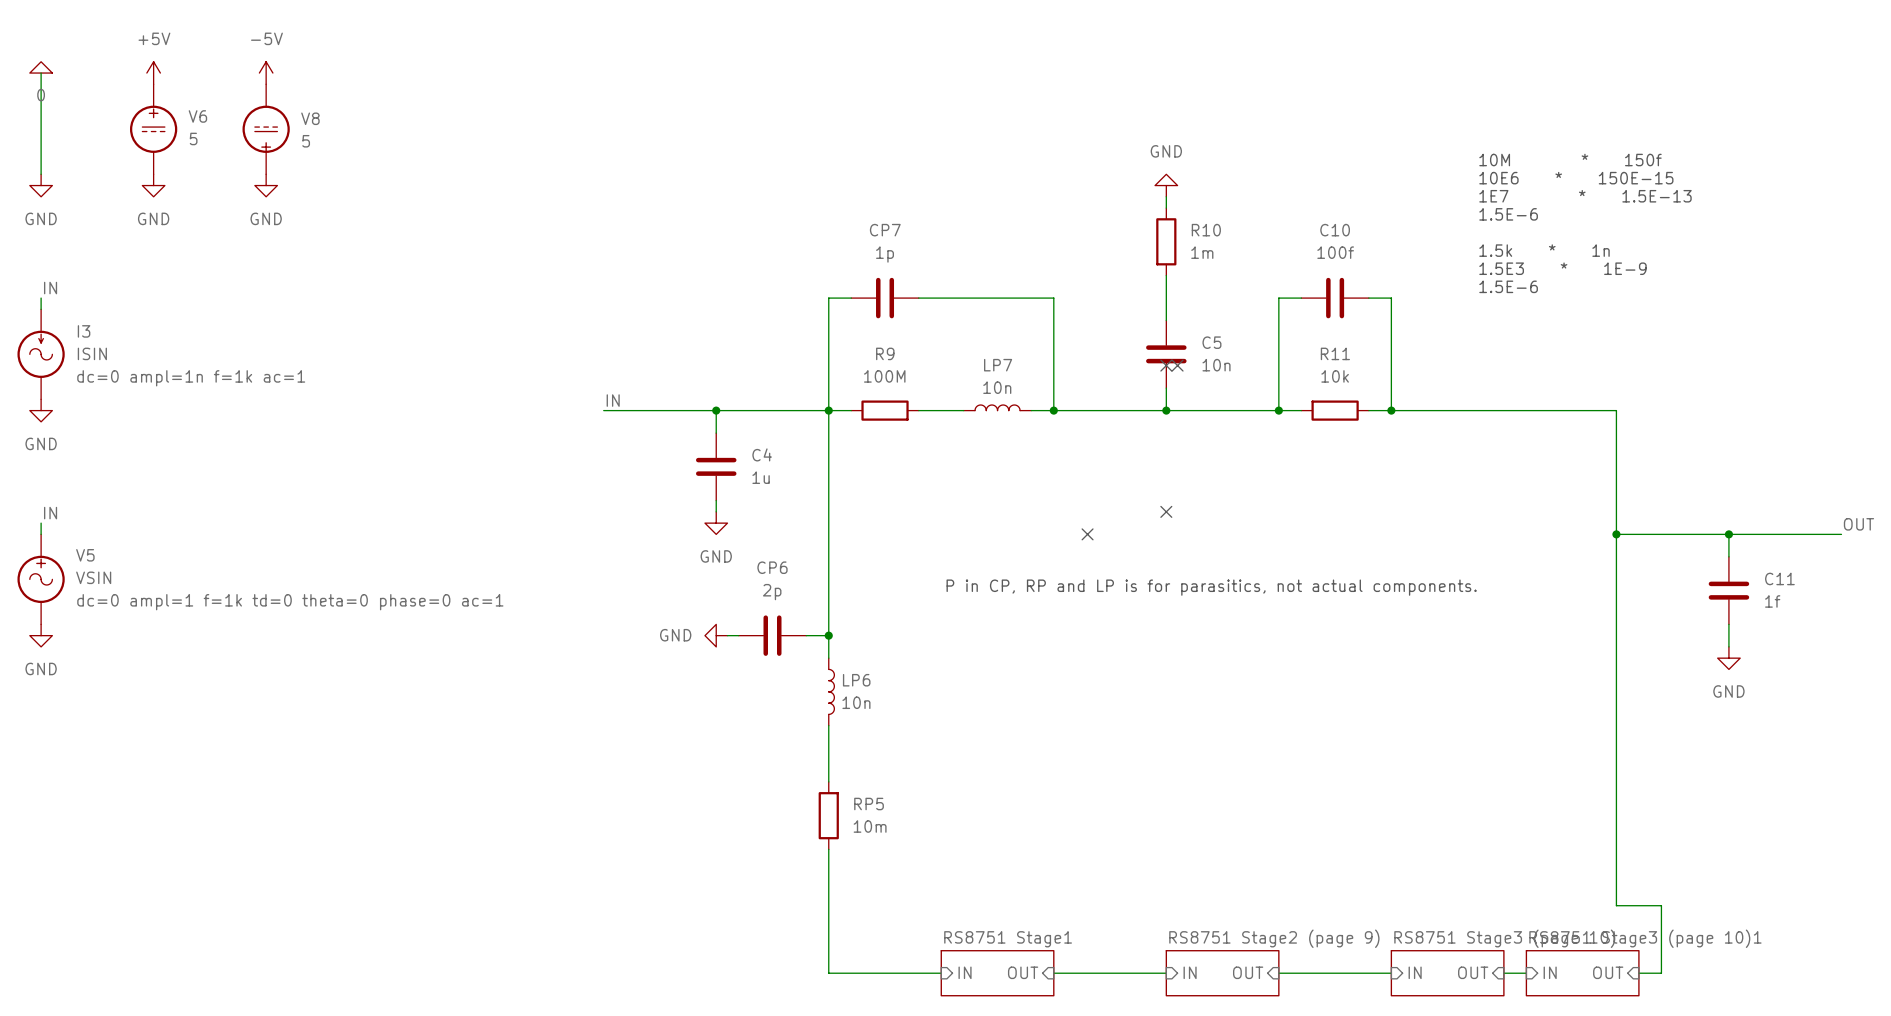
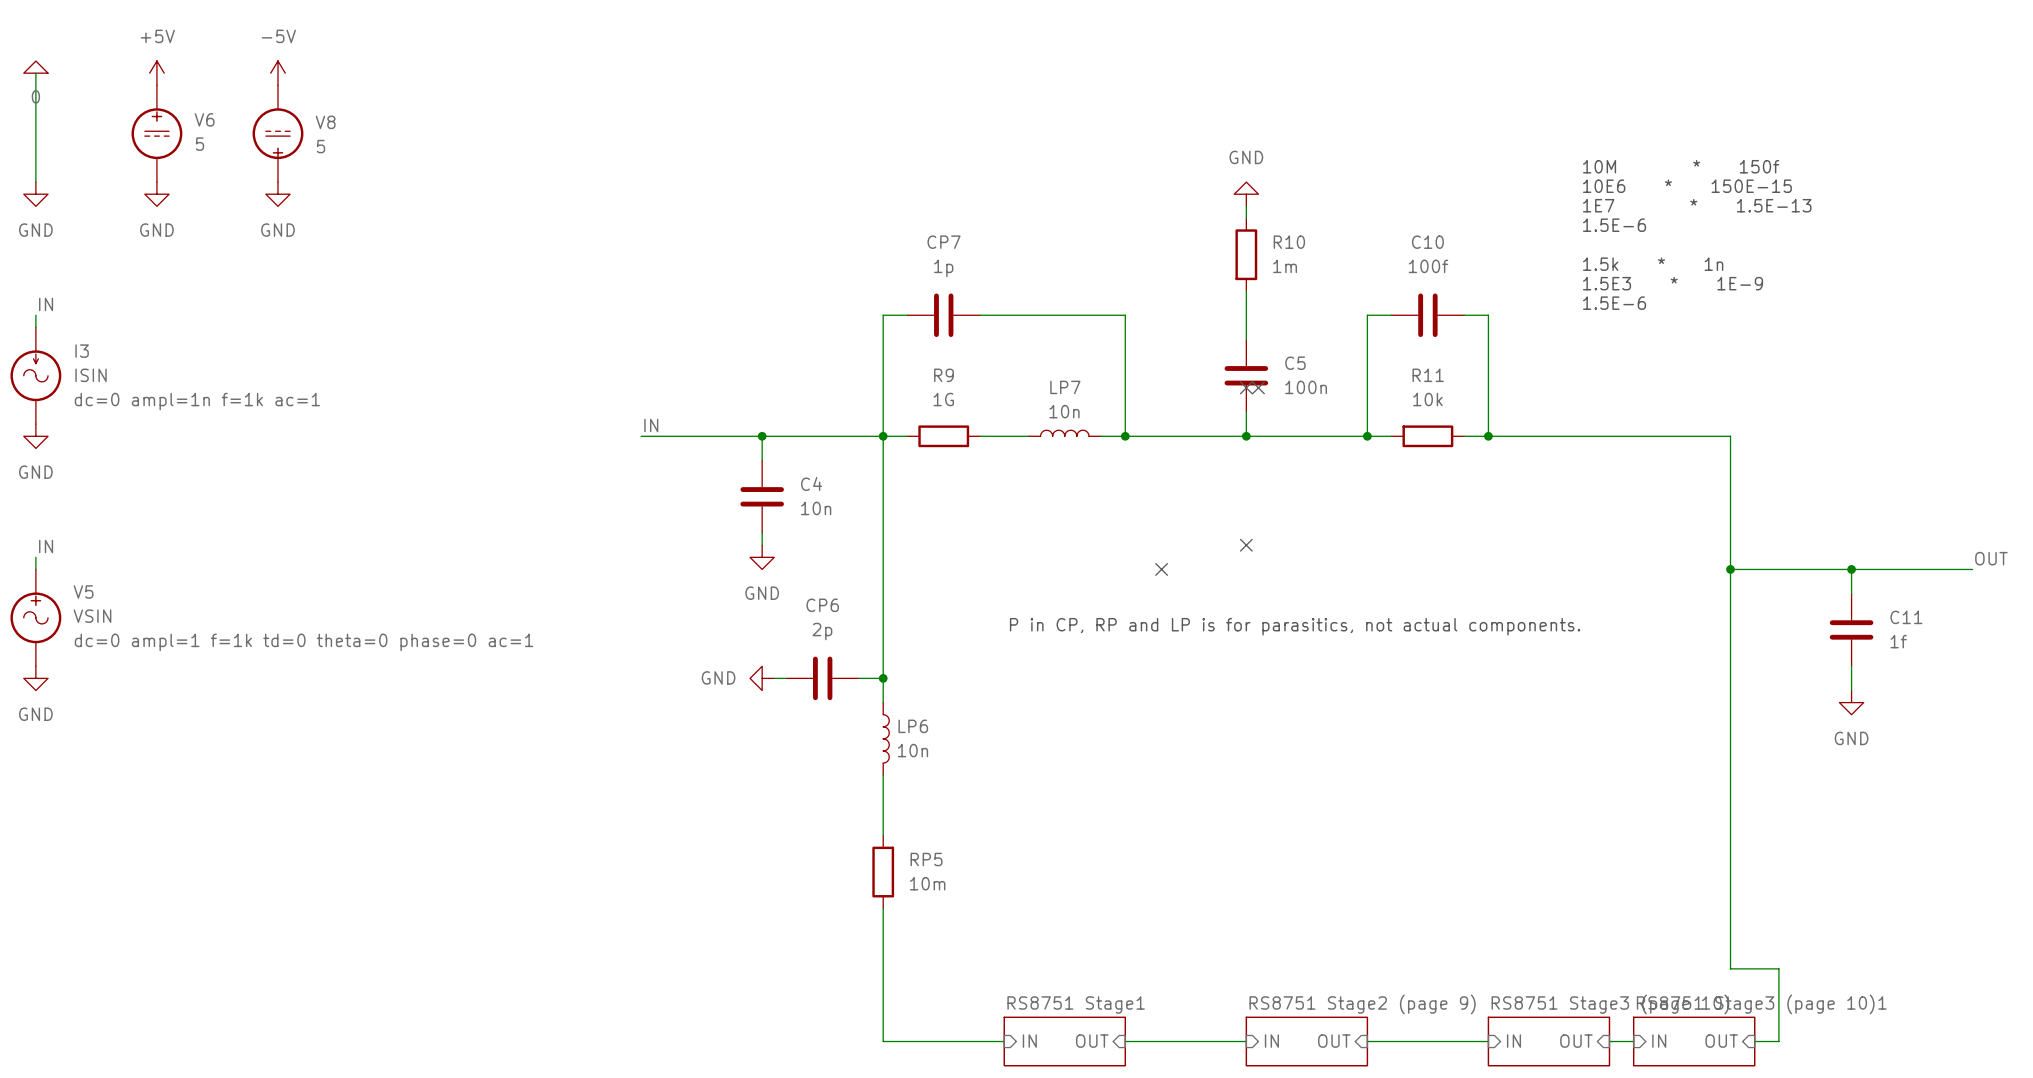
C5 value: 10n (1216, 365) -> 100n (1306, 387)
R9 value: 100M (884, 376) -> 1G (943, 399)
C4 value: 1u (761, 477) -> 10n (816, 508)

